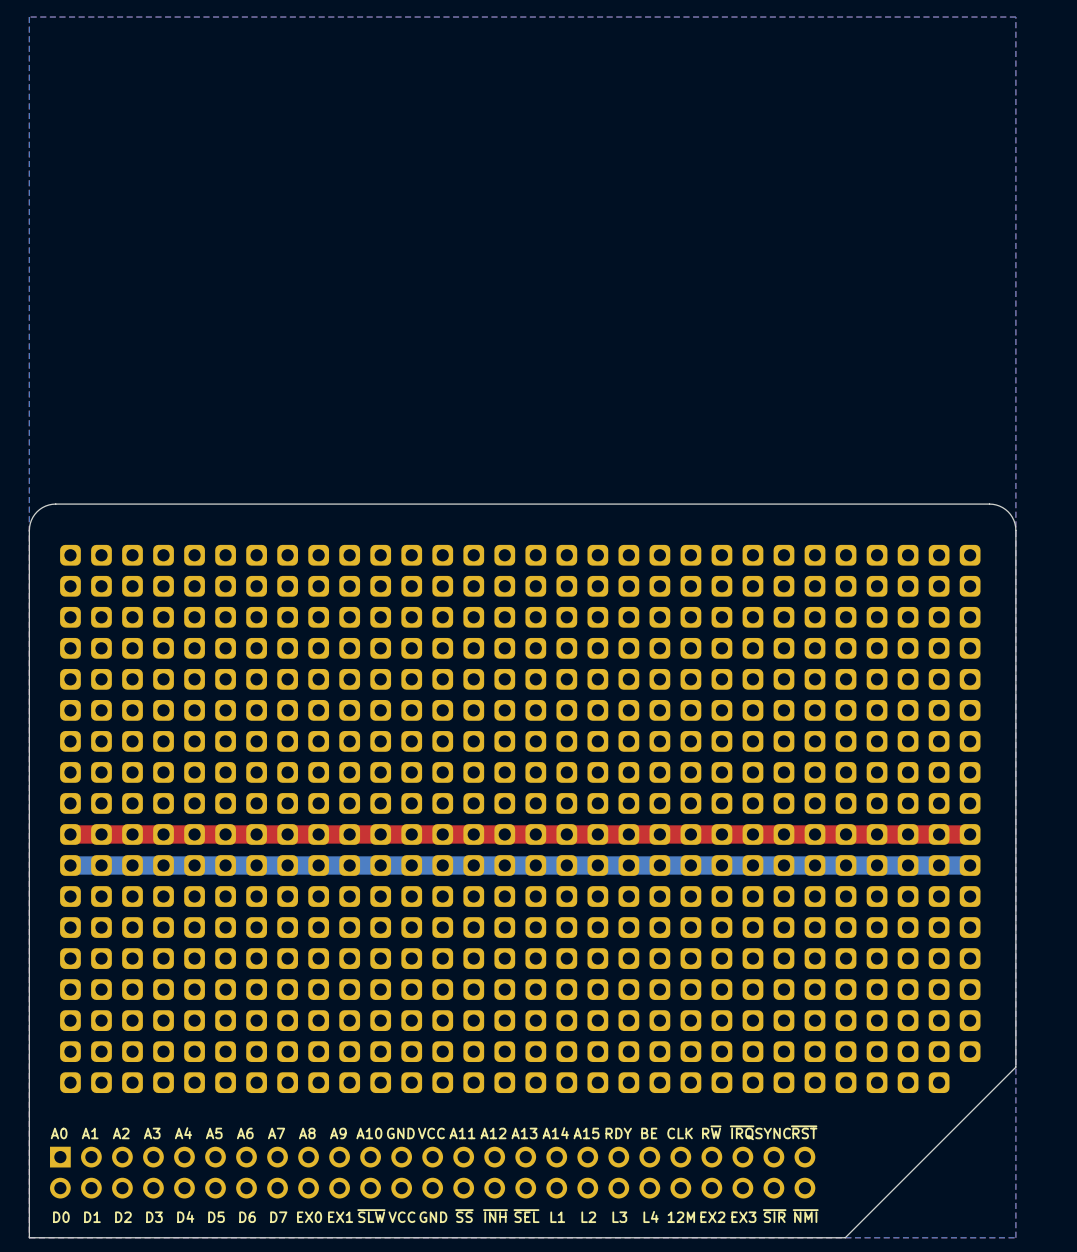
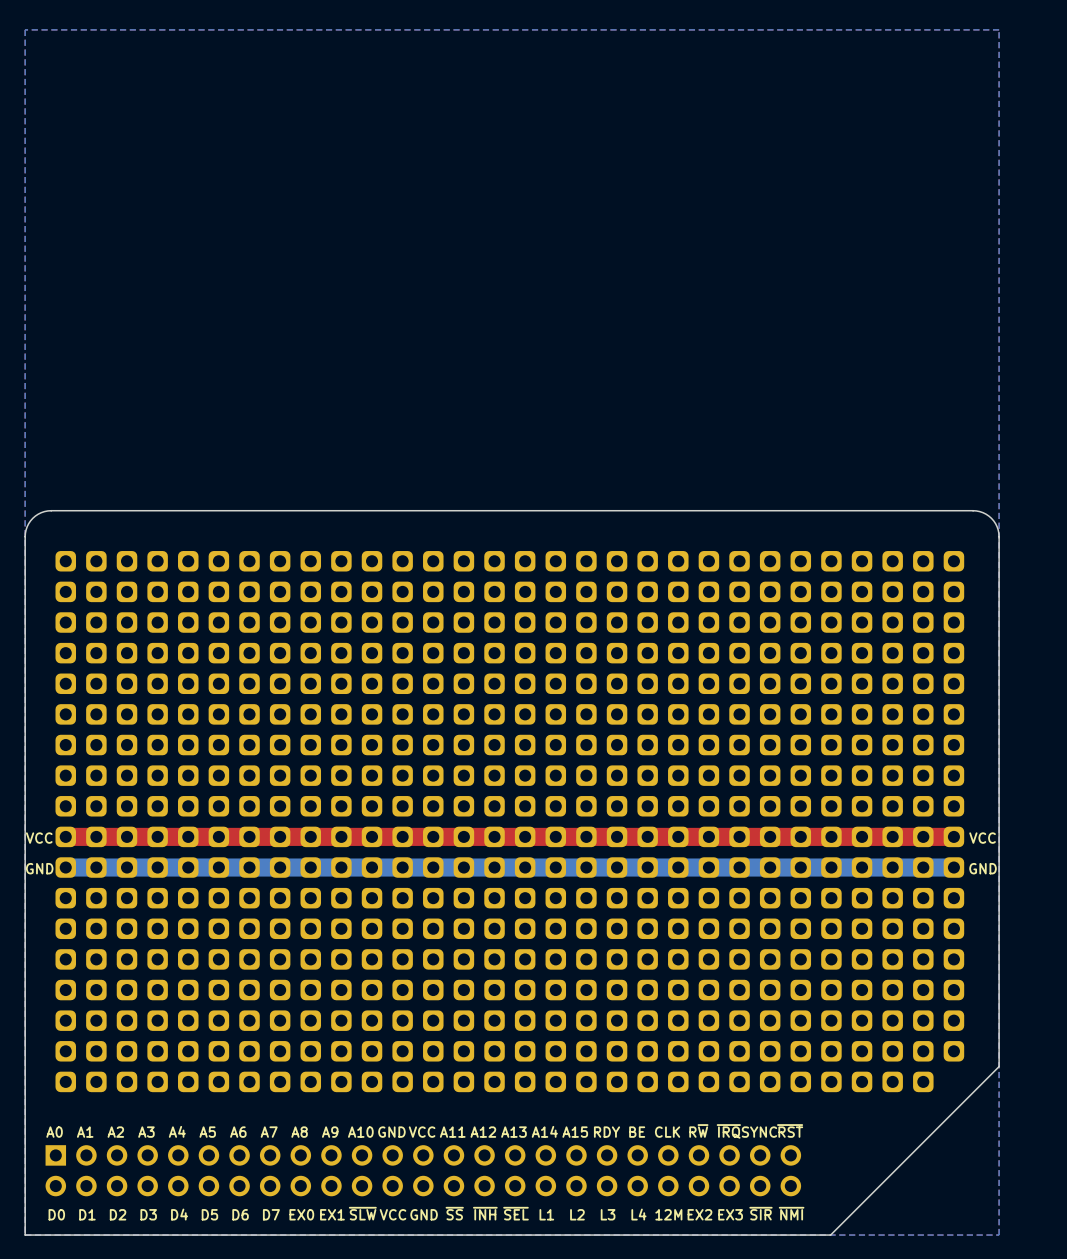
text: none -> VCC (39, 838)
text: none -> VCC (982, 838)
text: none -> GND (39, 868)
text: none -> GND (983, 868)

